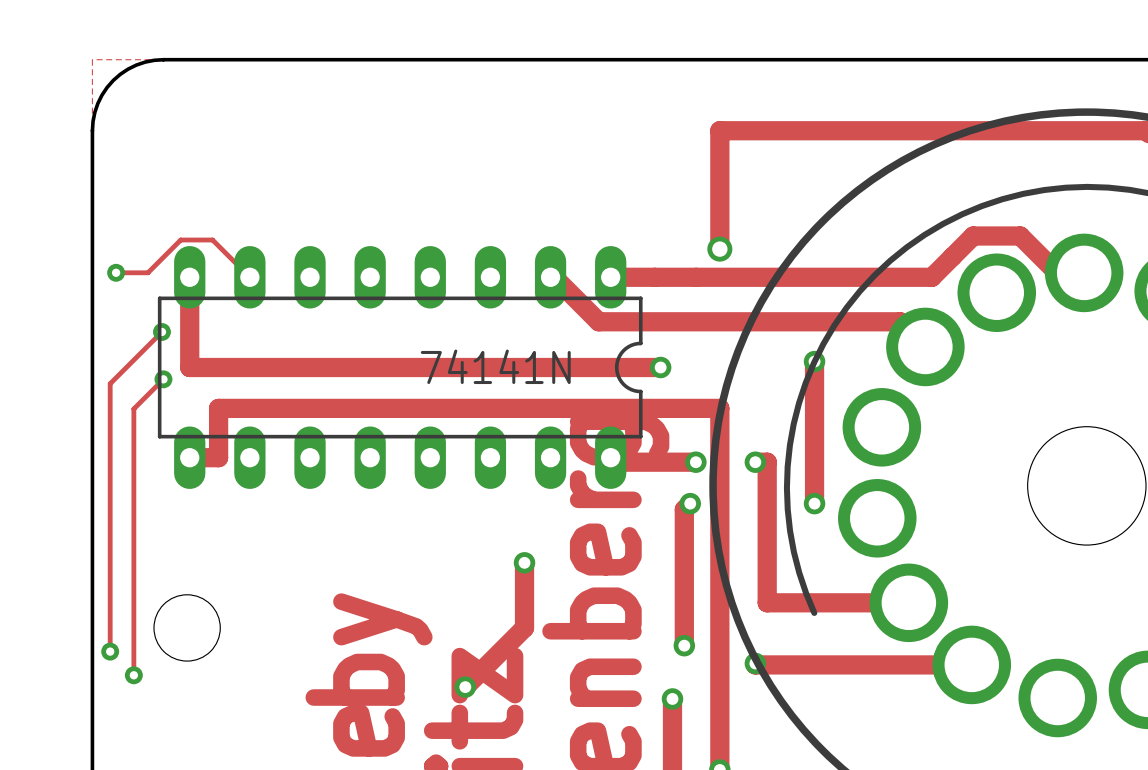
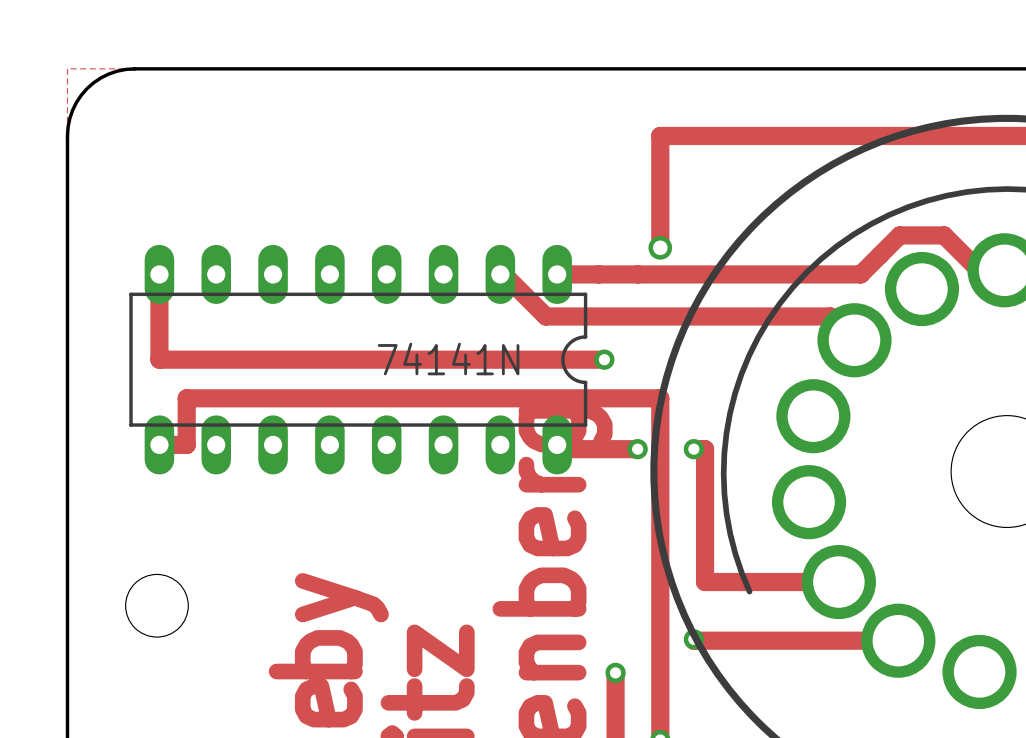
track: (116, 272) (147, 272) (180, 240) (212, 240) (249, 277) -> none
via: (116, 272) -> none
track: (161, 331) (110, 383) (110, 651) -> none
via: (161, 331) -> none
track: (814, 361) (814, 503) -> none
via: (814, 361) -> none
track: (163, 379) (133, 408) (133, 675) -> none
via: (163, 379) -> none
track: (690, 503) (684, 509) (684, 645) -> none
via: (690, 503) -> none
via: (814, 503) -> none
track: (524, 562) (524, 627) (465, 687) -> none
via: (524, 562) -> none
via: (684, 645) -> none
via: (110, 651) -> none
via: (133, 675) -> none
via: (465, 687) -> none

